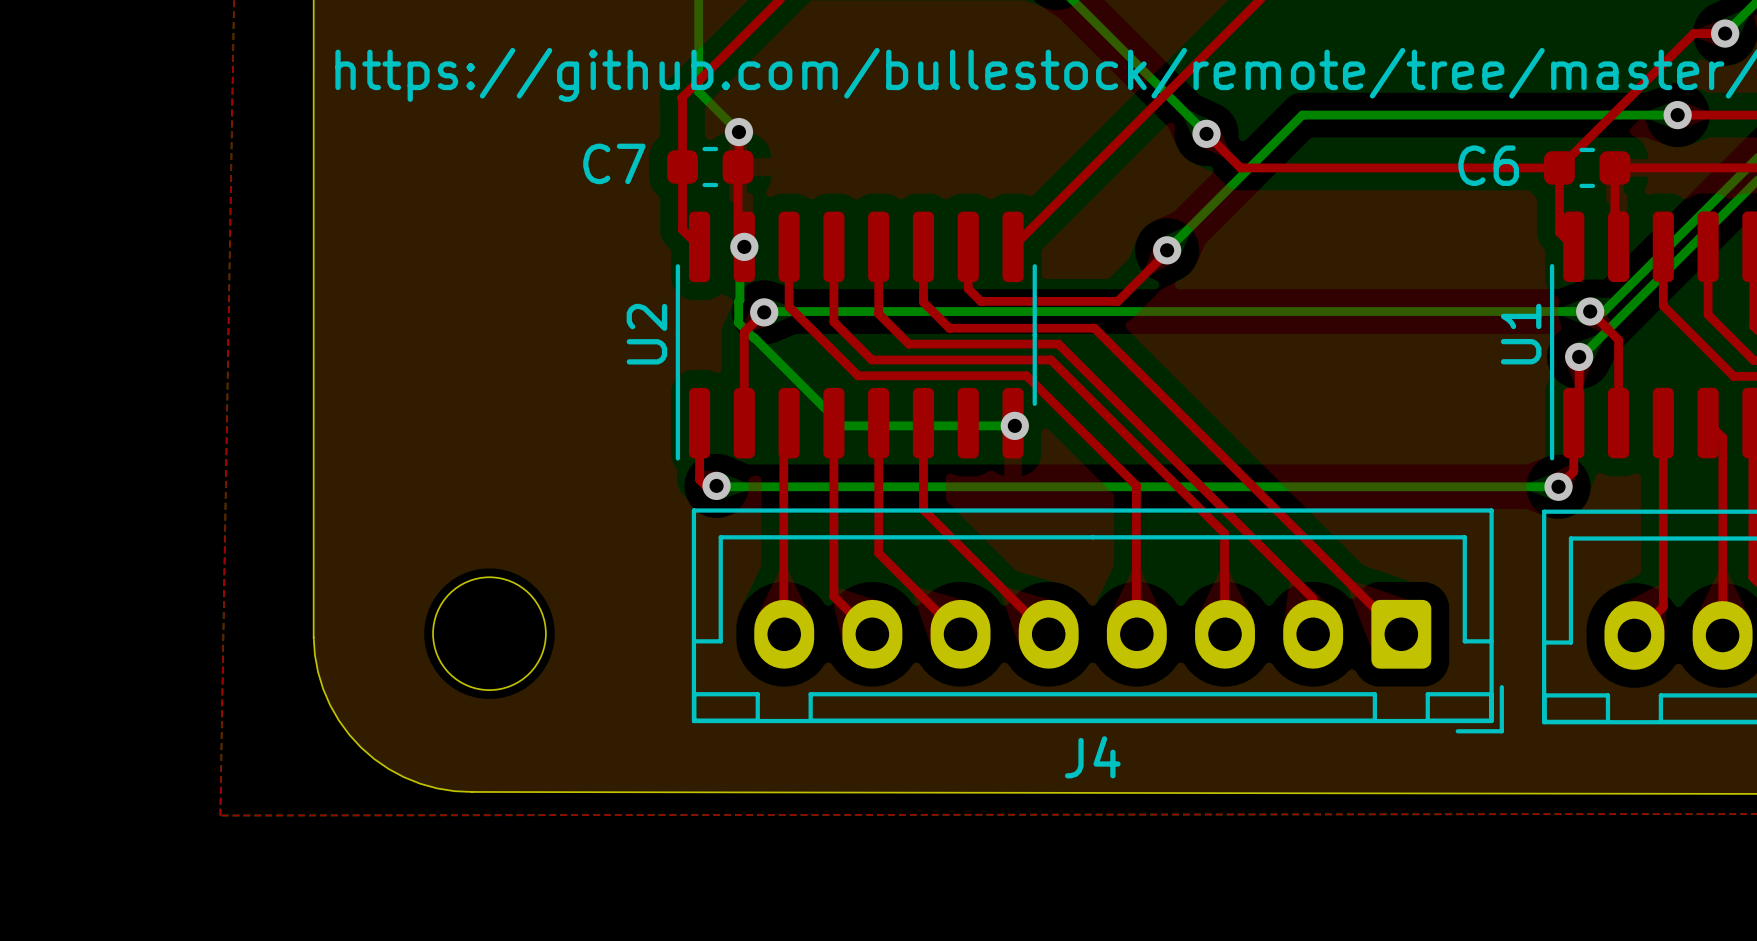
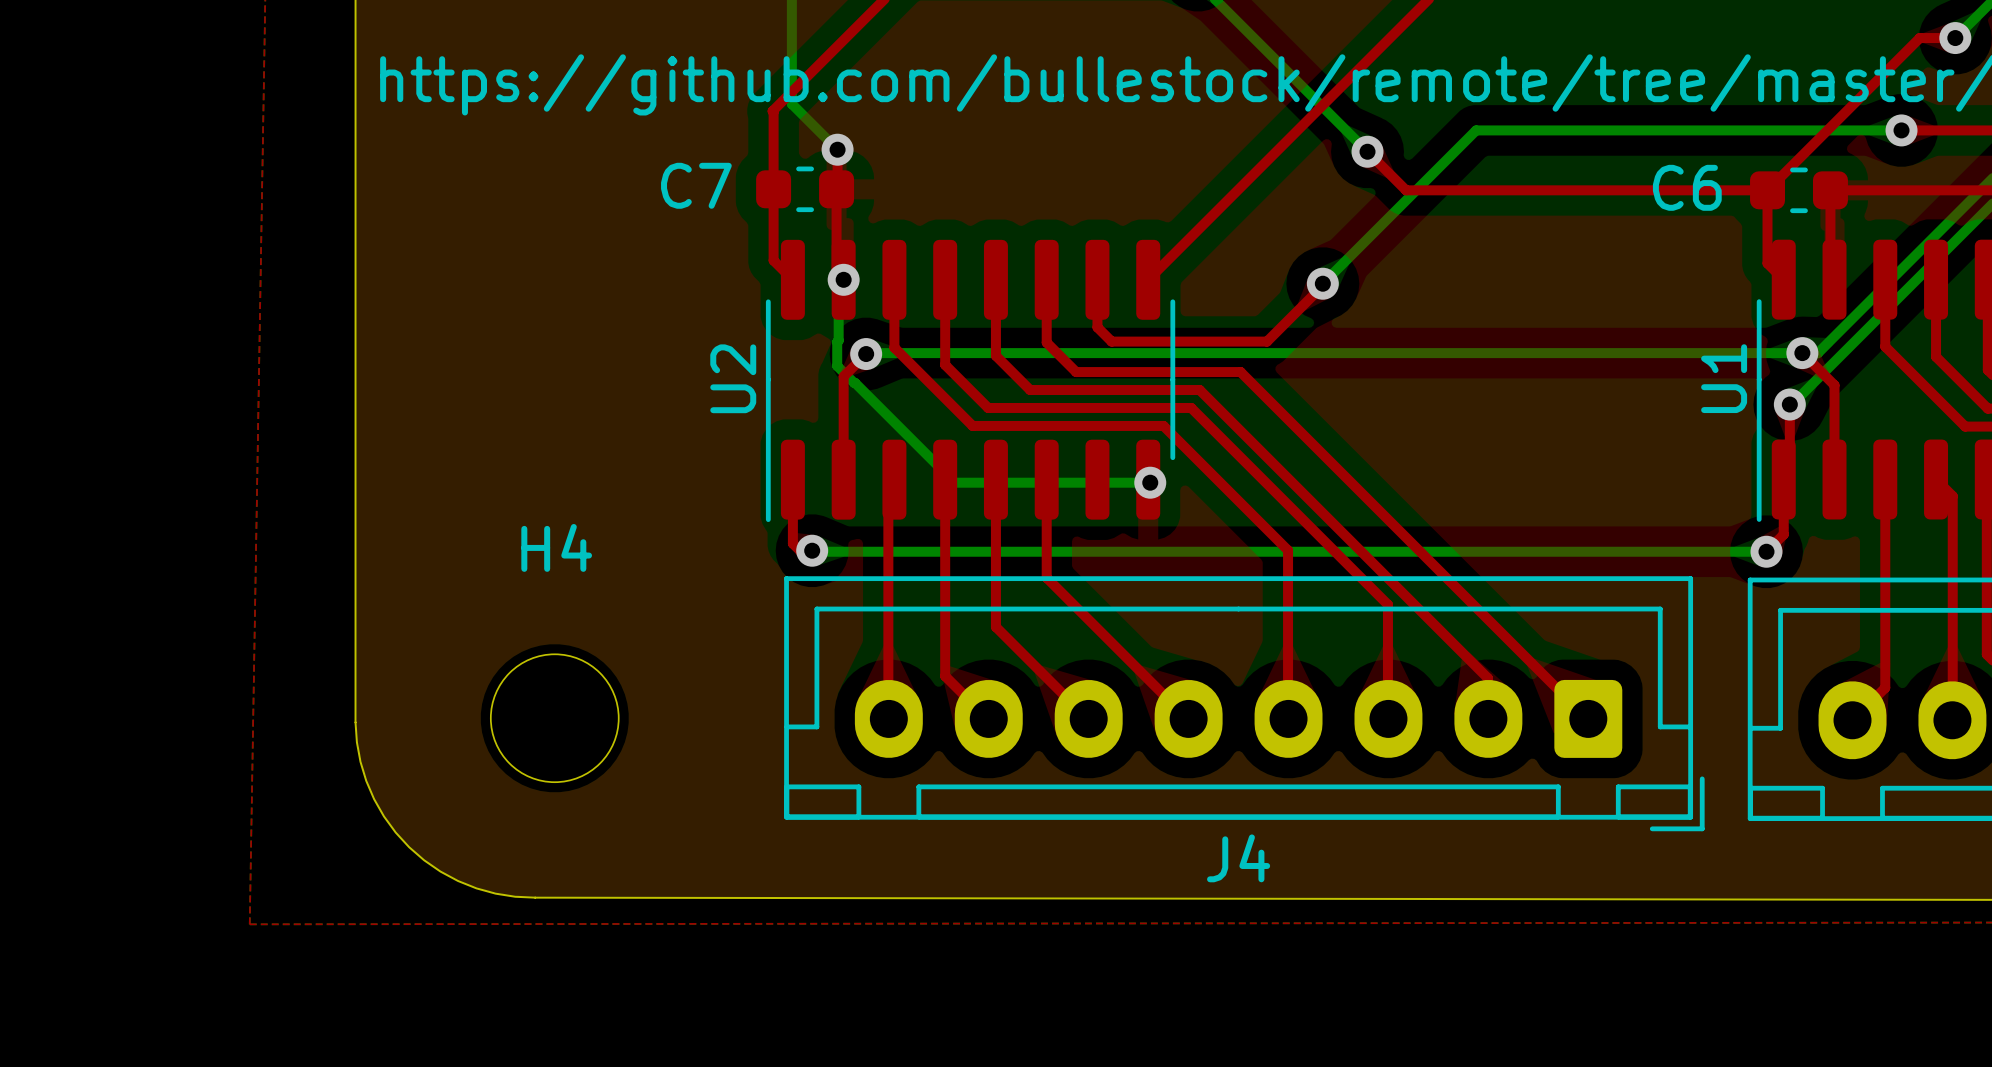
H4 name: none -> H4 (556, 547)

